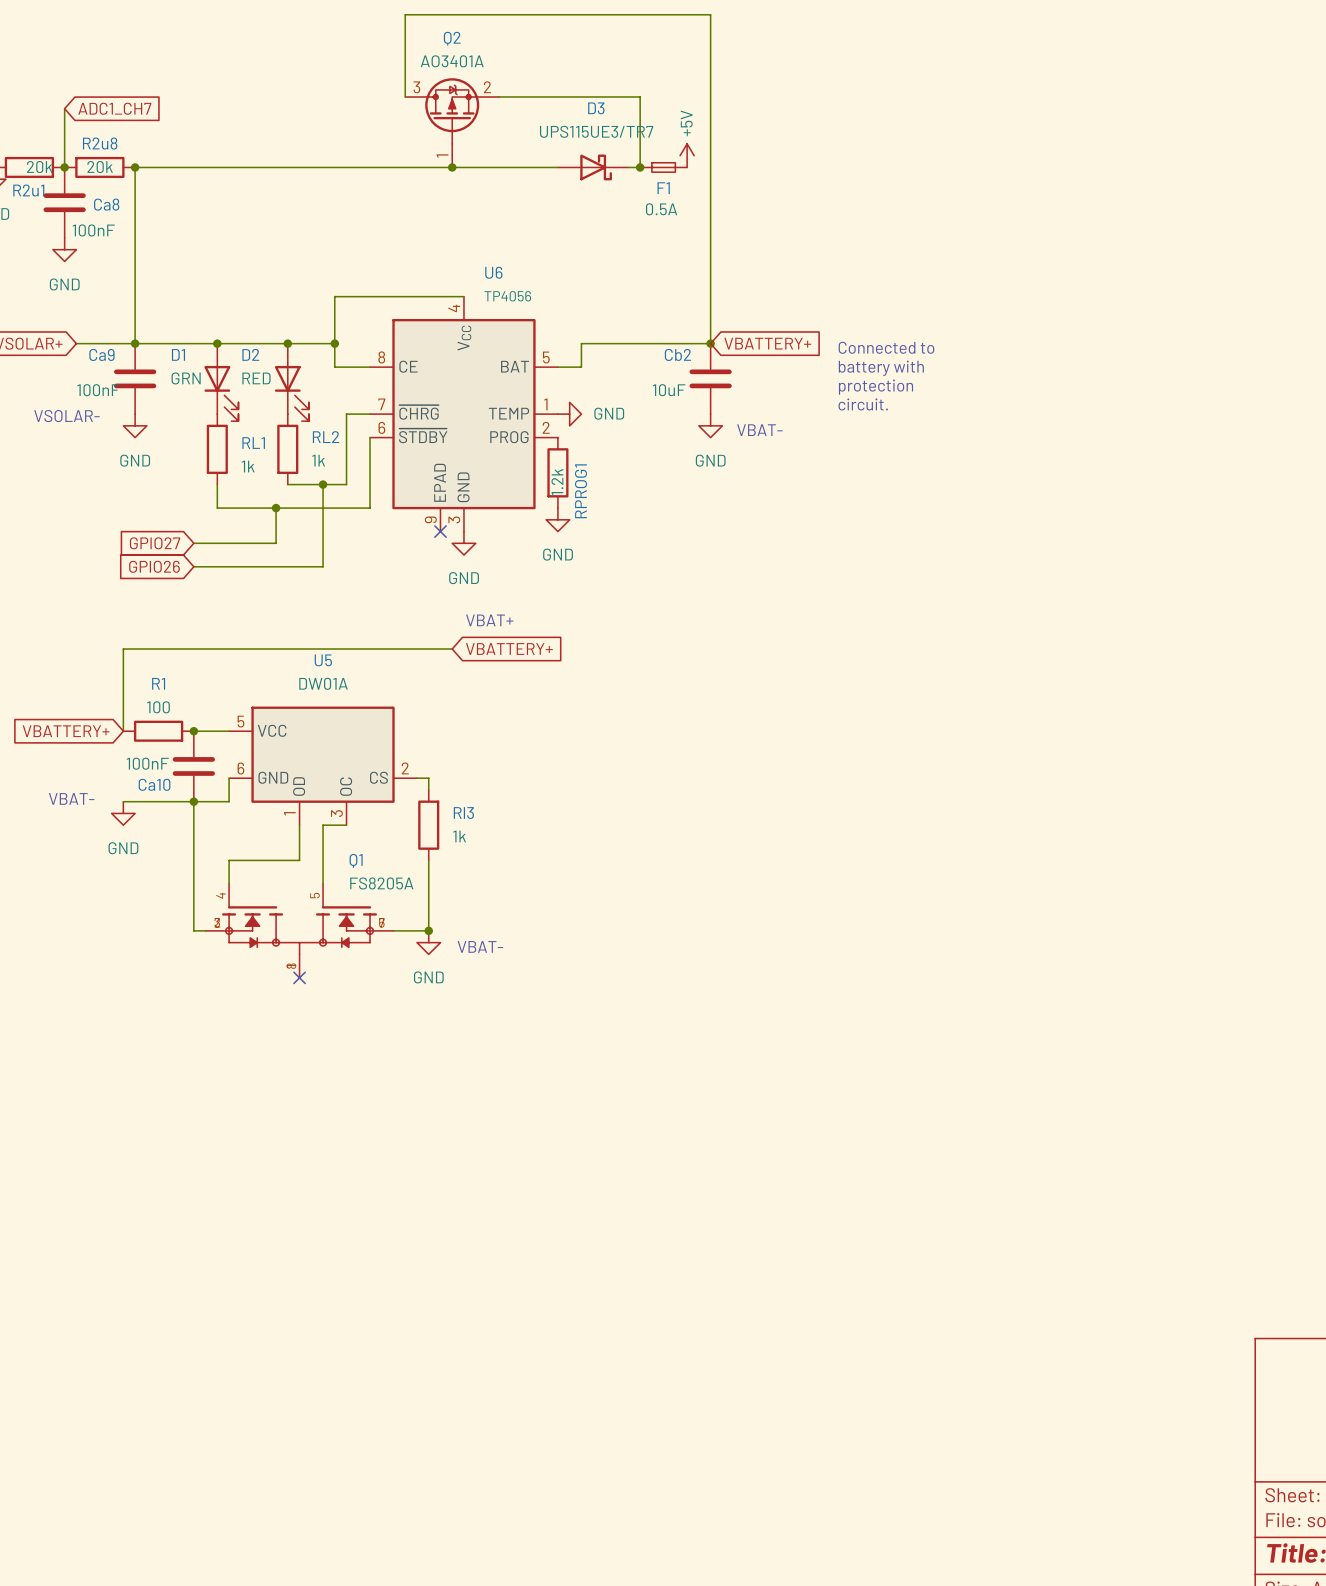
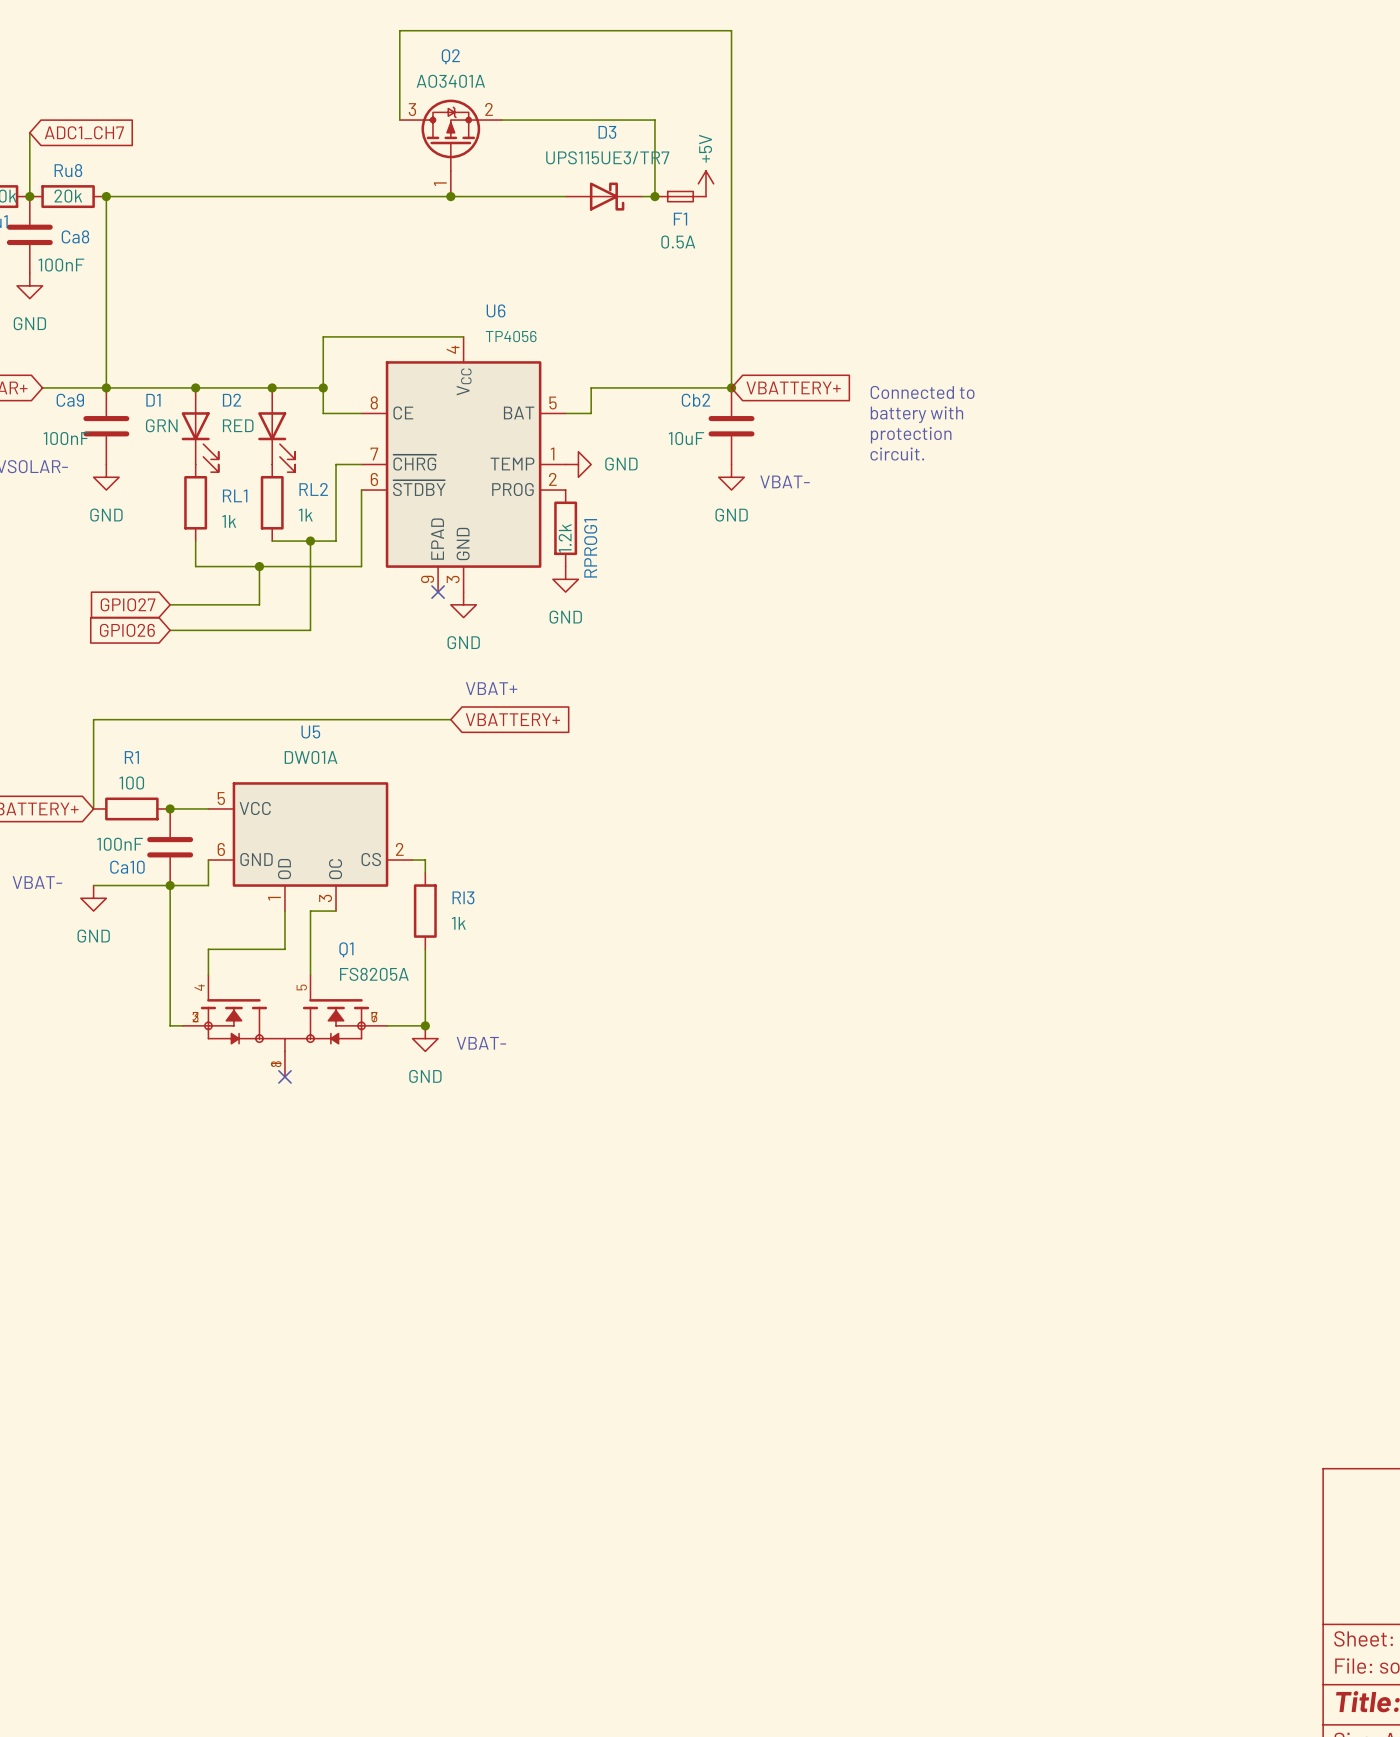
R2u8 name: R2u8 (100, 143) -> Ru8 (68, 170)

